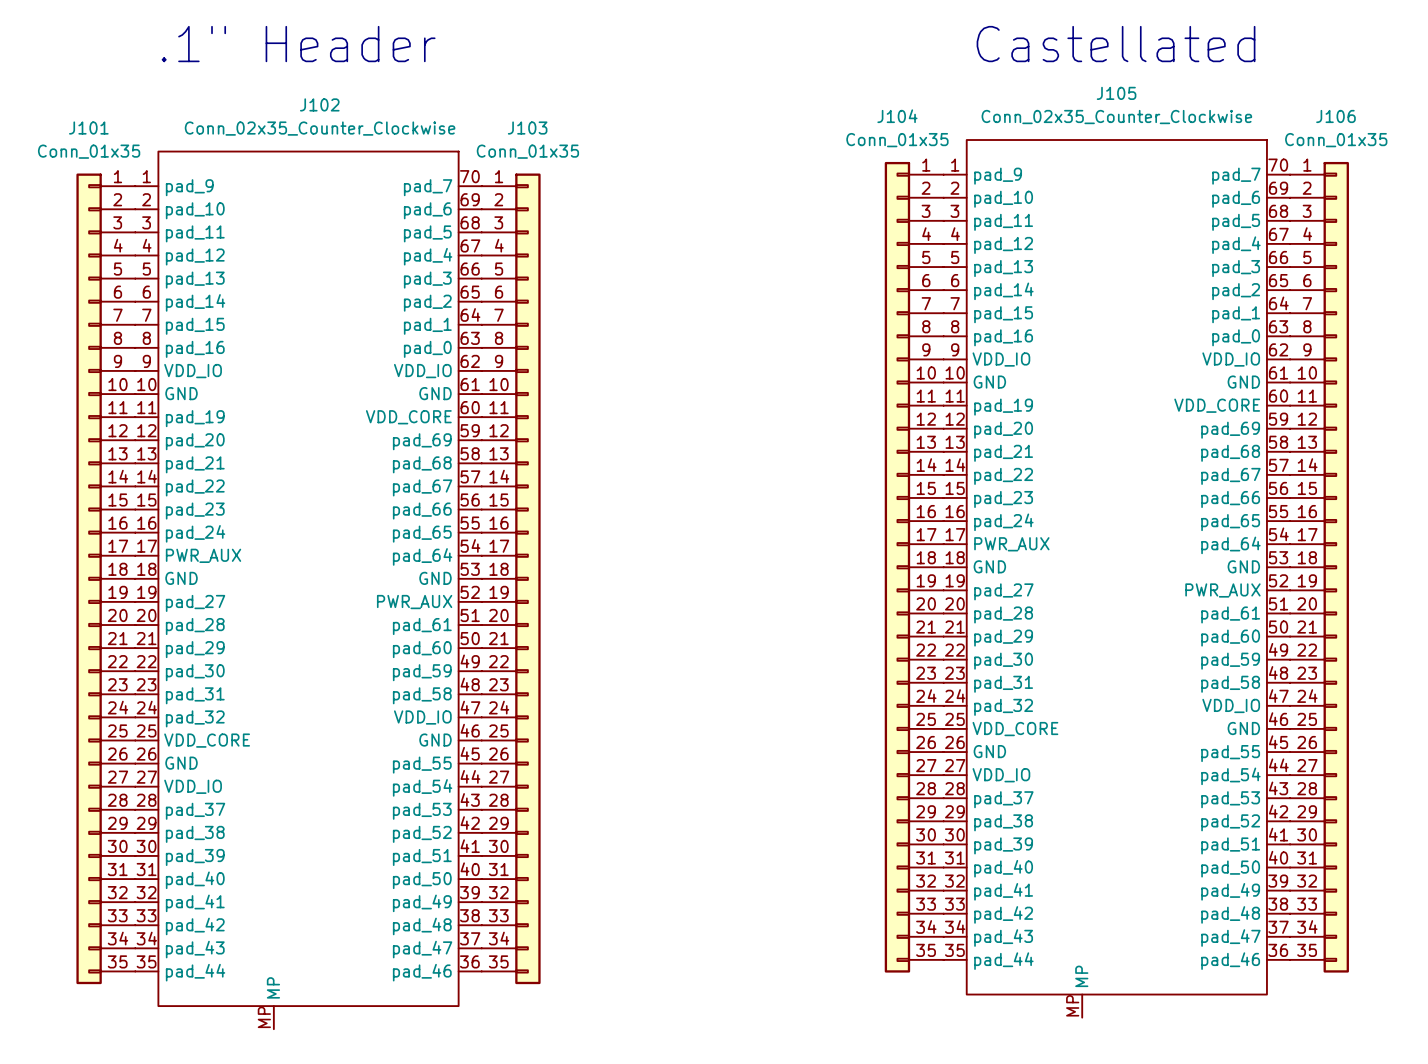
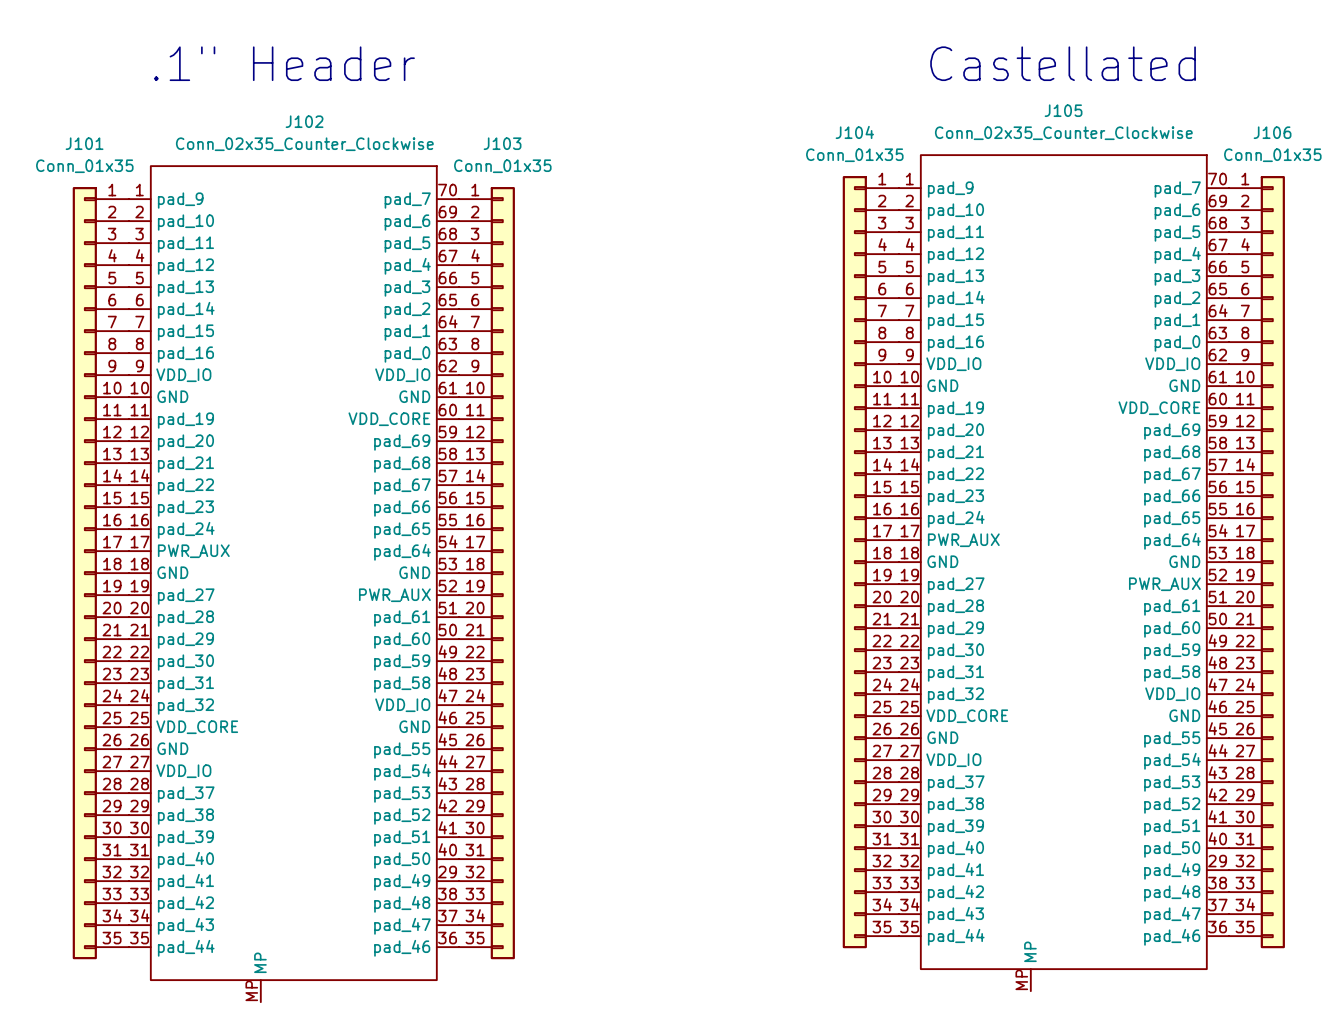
J105 pin number: 39 (1278, 881) -> 29 (1217, 861)
J102 pin number: 39 (469, 892) -> 29 (447, 872)

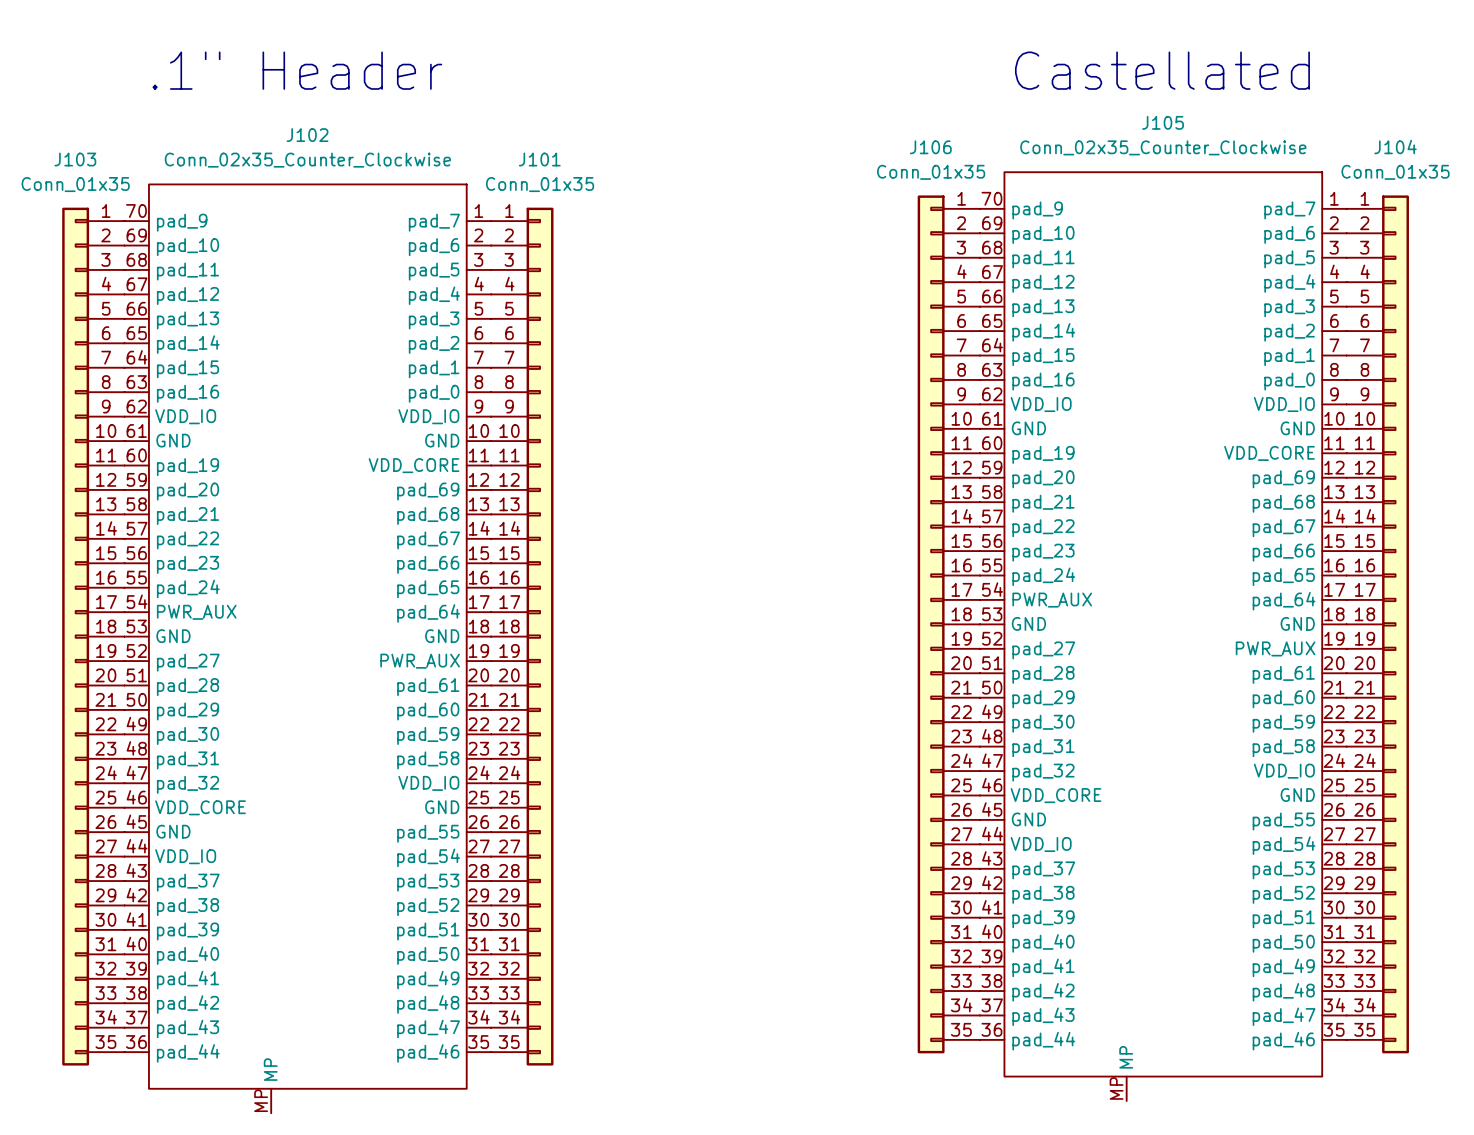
J104 name: J104 (854, 132) -> J106 (930, 147)
J106 name: J106 (1272, 132) -> J104 (1395, 147)
J101 name: J101 (84, 143) -> J103 (75, 159)
J103 name: J103 (502, 143) -> J101 (539, 159)
J105 symbol: [898, 155, 1229, 992] -> [980, 172, 1347, 1102]
J102 symbol: [128, 166, 459, 1003] -> [124, 184, 492, 1114]

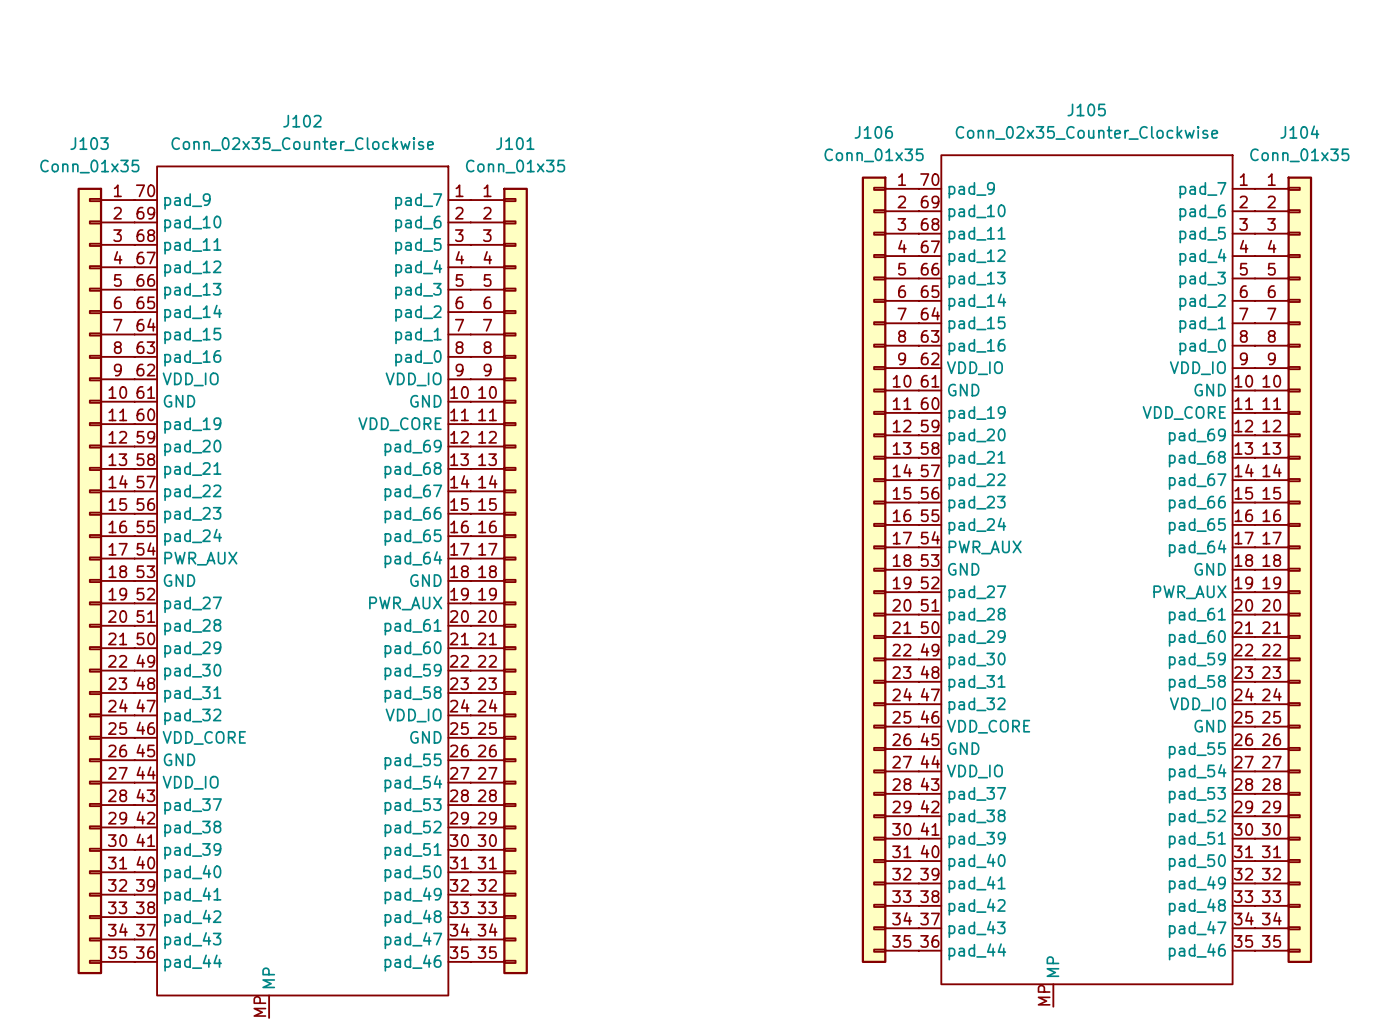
text: .1" Header (297, 70) -> none
text: Castellated (1162, 70) -> none

